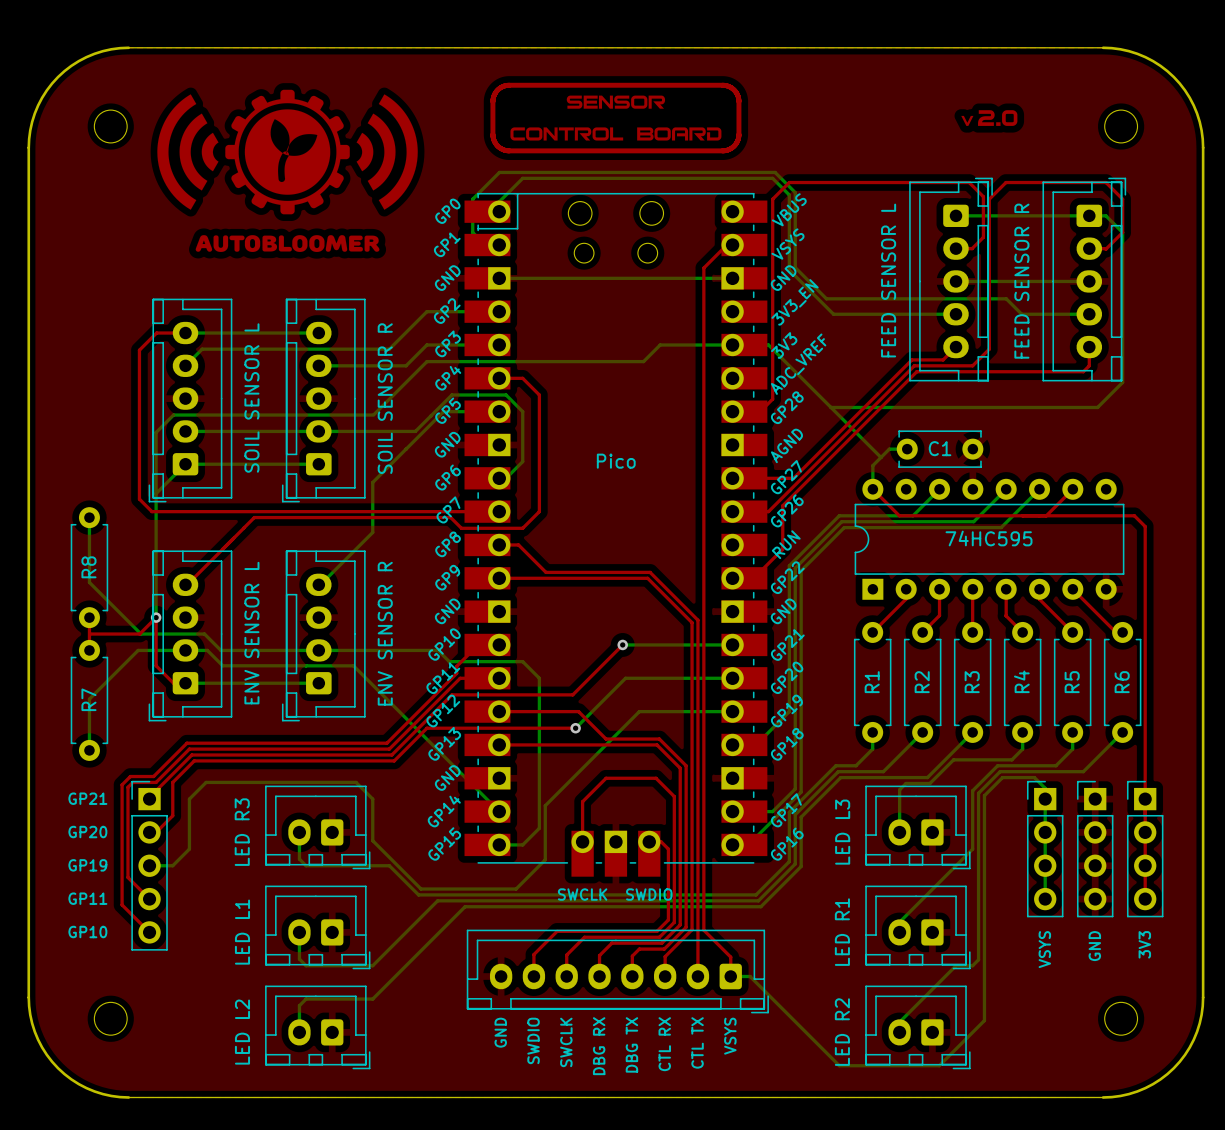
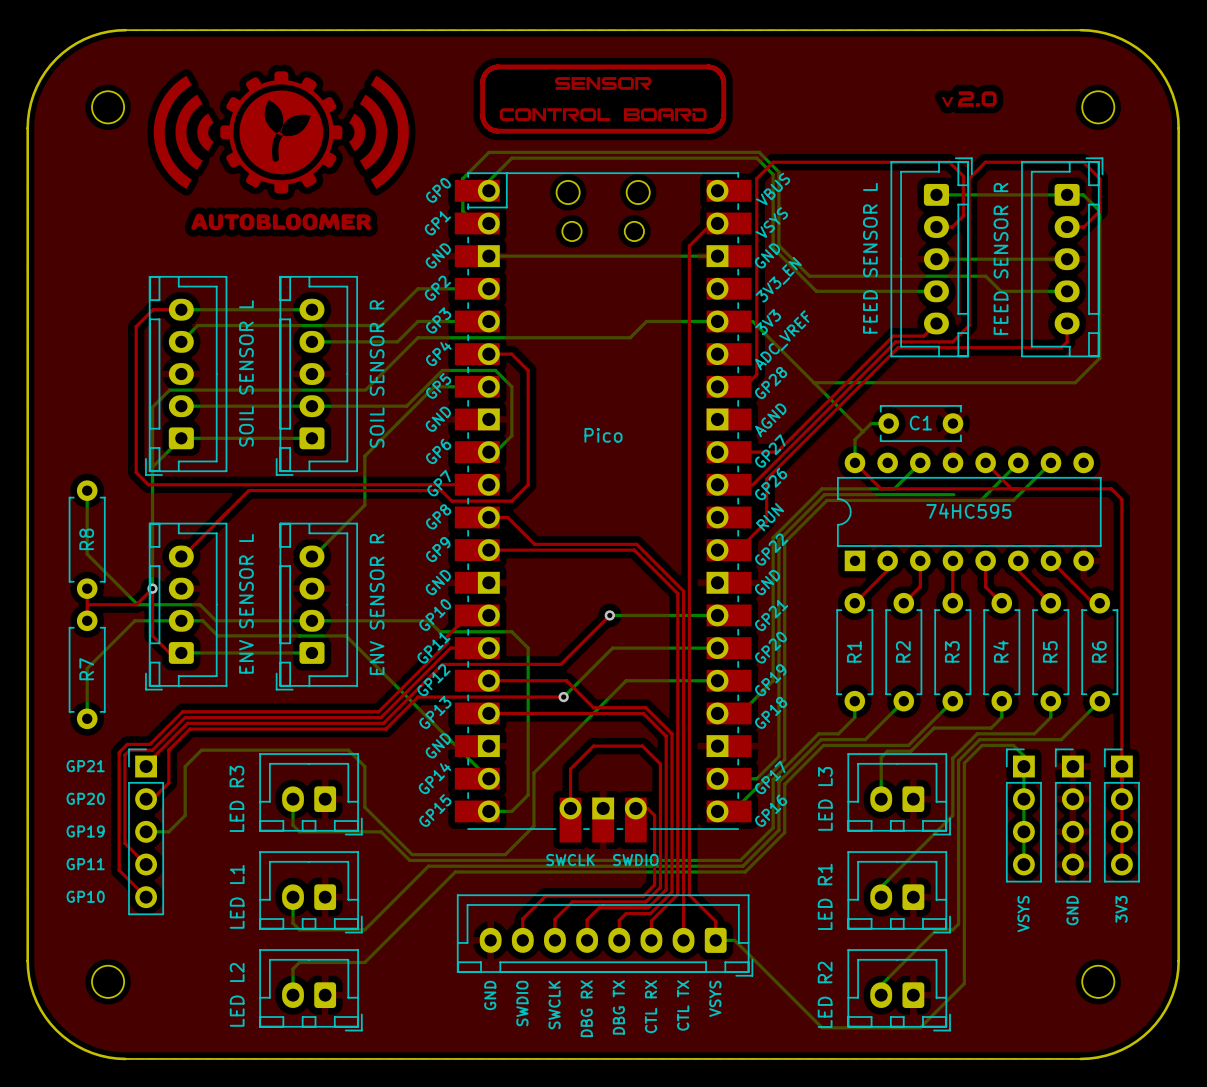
top track: none -> (985, 462) (1011, 488)
bottom track: (1006, 489) (973, 521) -> none
top track: (1072, 489) (1046, 515) -> none
bottom track: none -> (1050, 462) (1013, 500) (980, 500)

